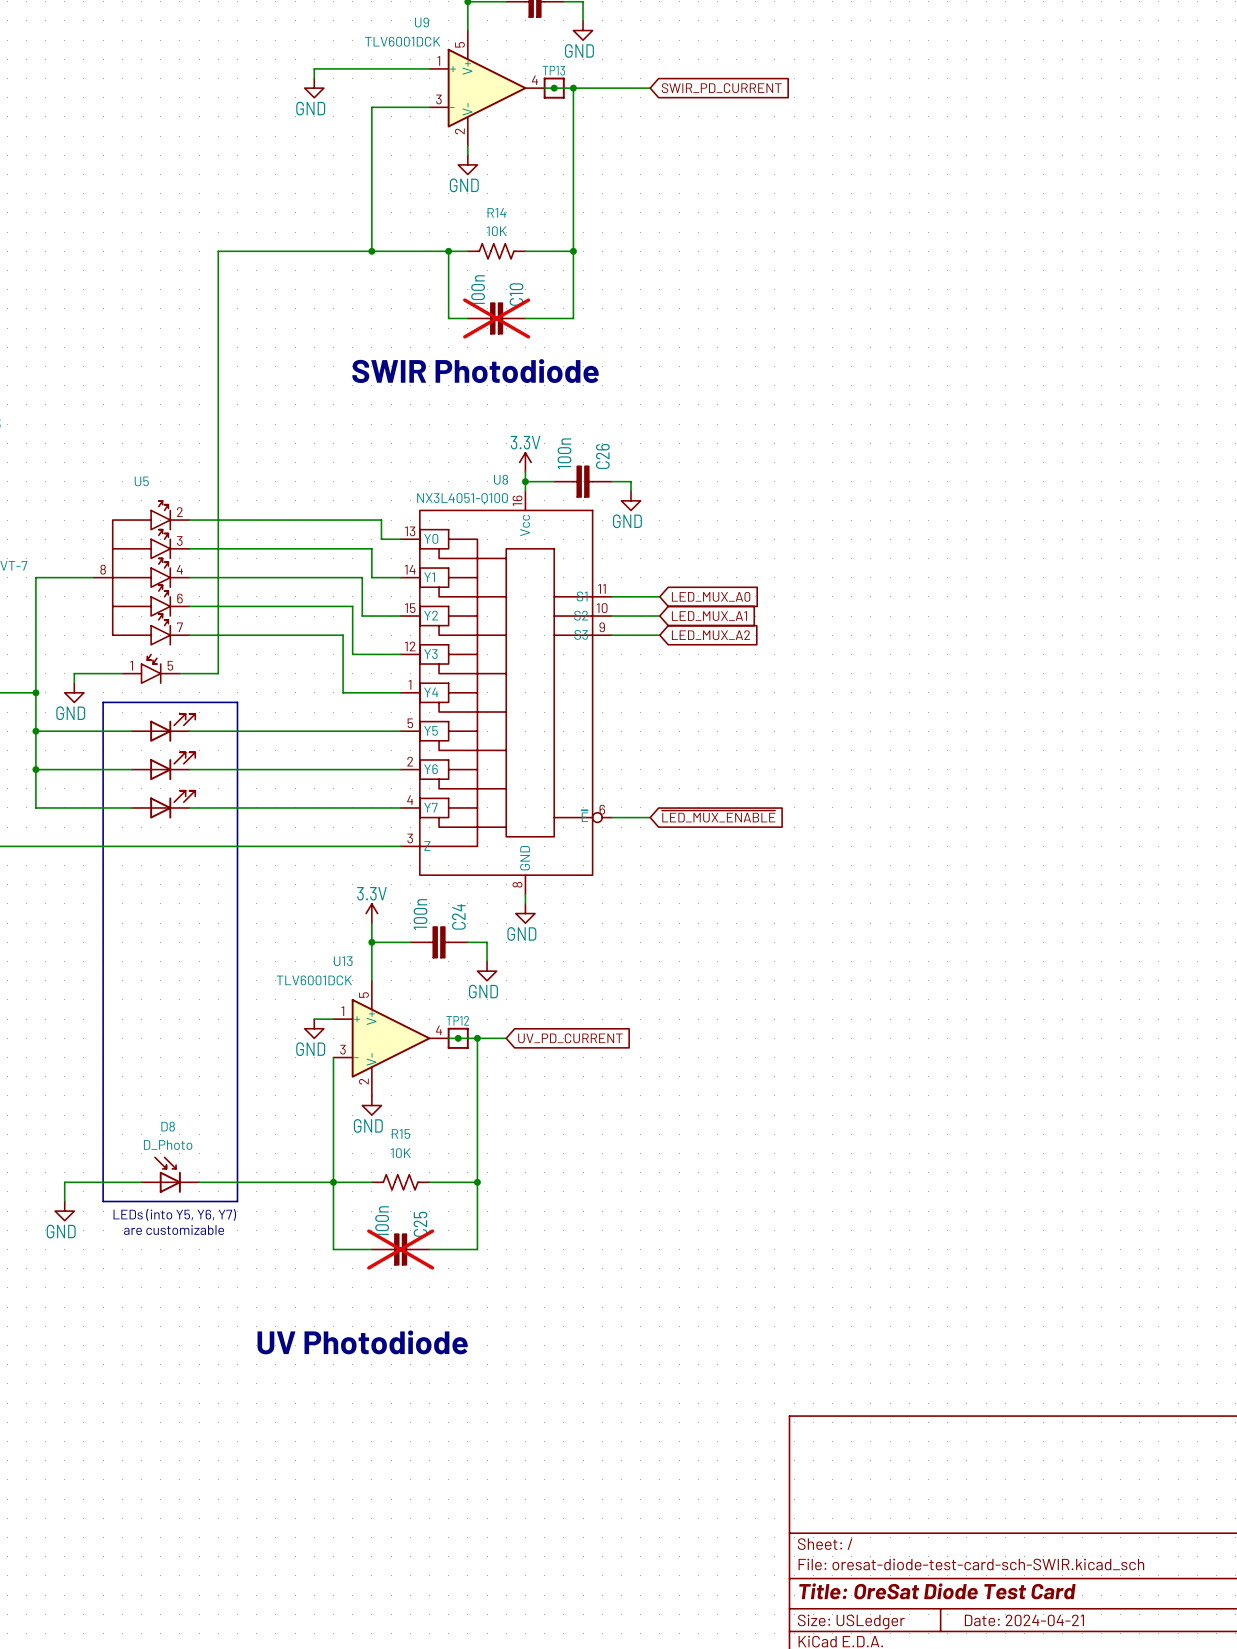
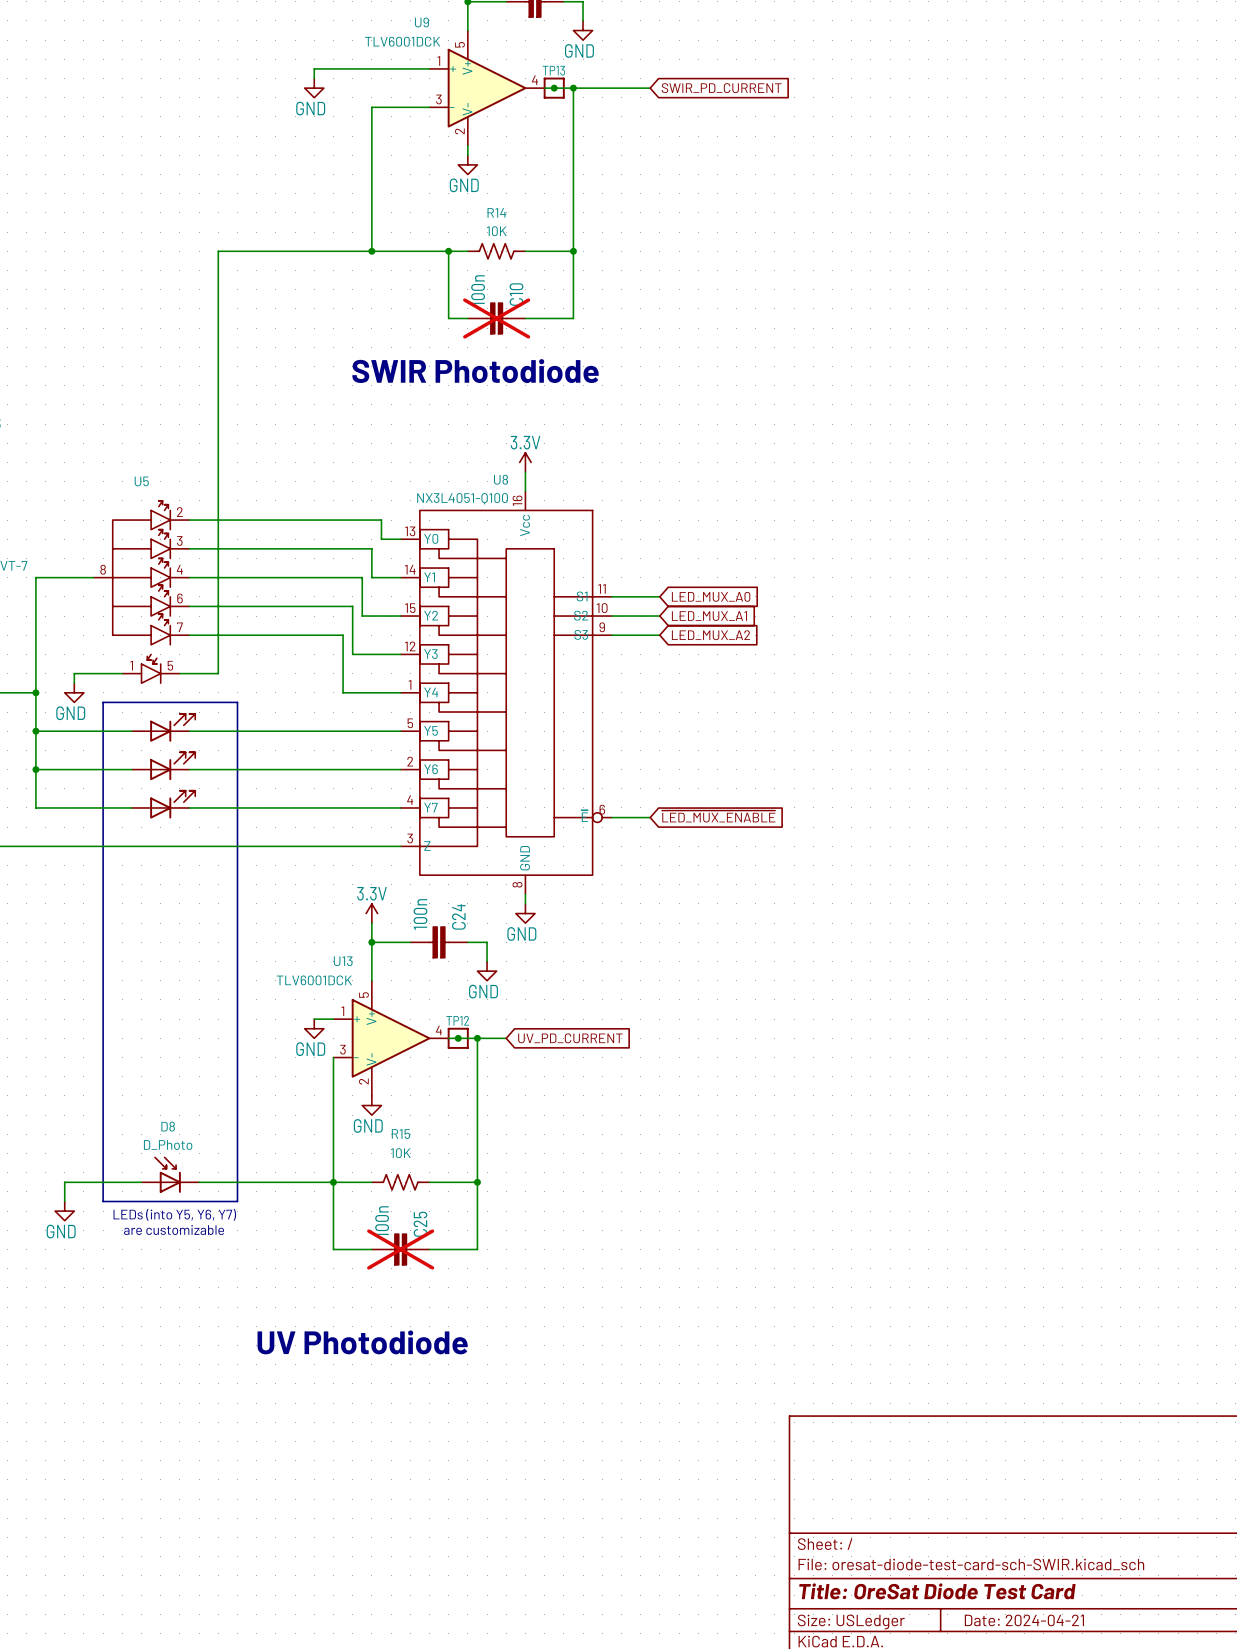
wire: (525, 481) (554, 481) -> none
junction: (525, 481) -> none
C26: 100n (583, 481) -> none
wire: (611, 481) (631, 481) (631, 491) -> none
power symbol: GND (631, 500) -> none

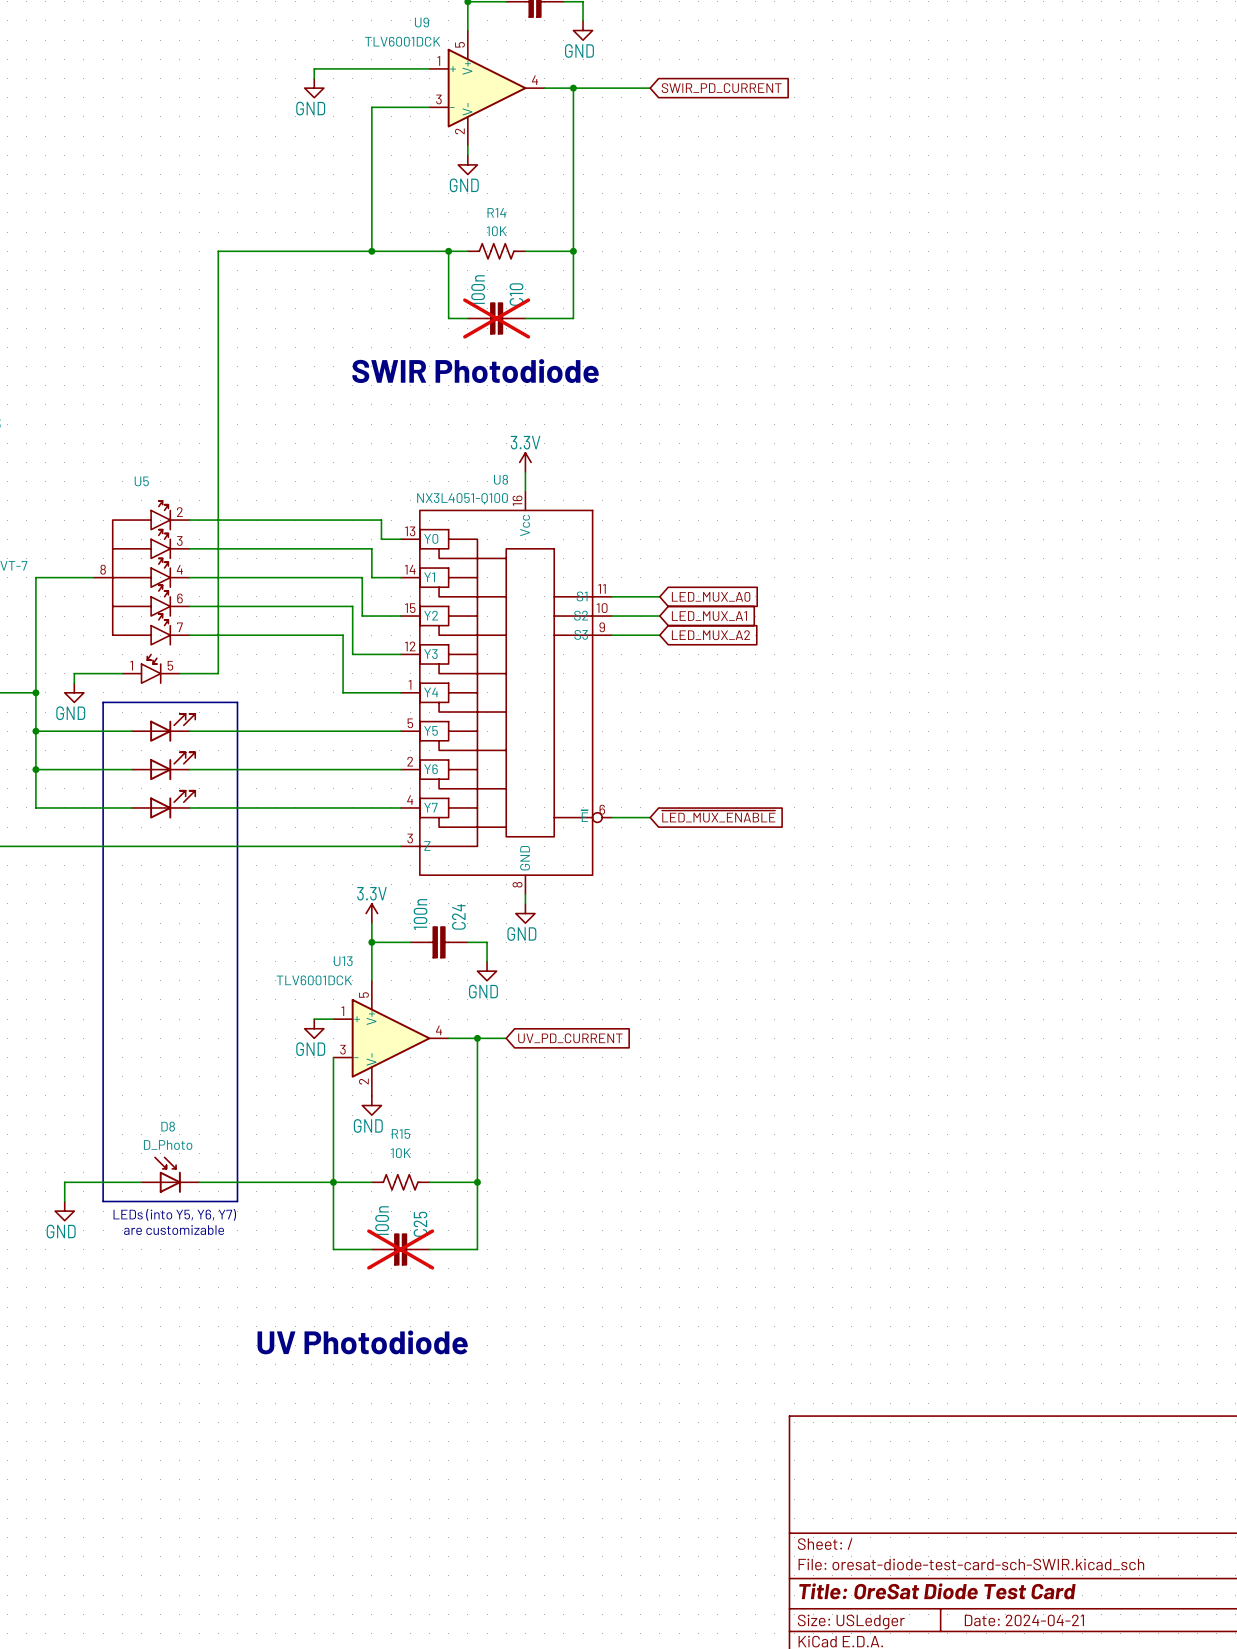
junction: (554, 88) -> none
TP13: (554, 88) -> none
junction: (458, 1038) -> none
TP12: (458, 1038) -> none

